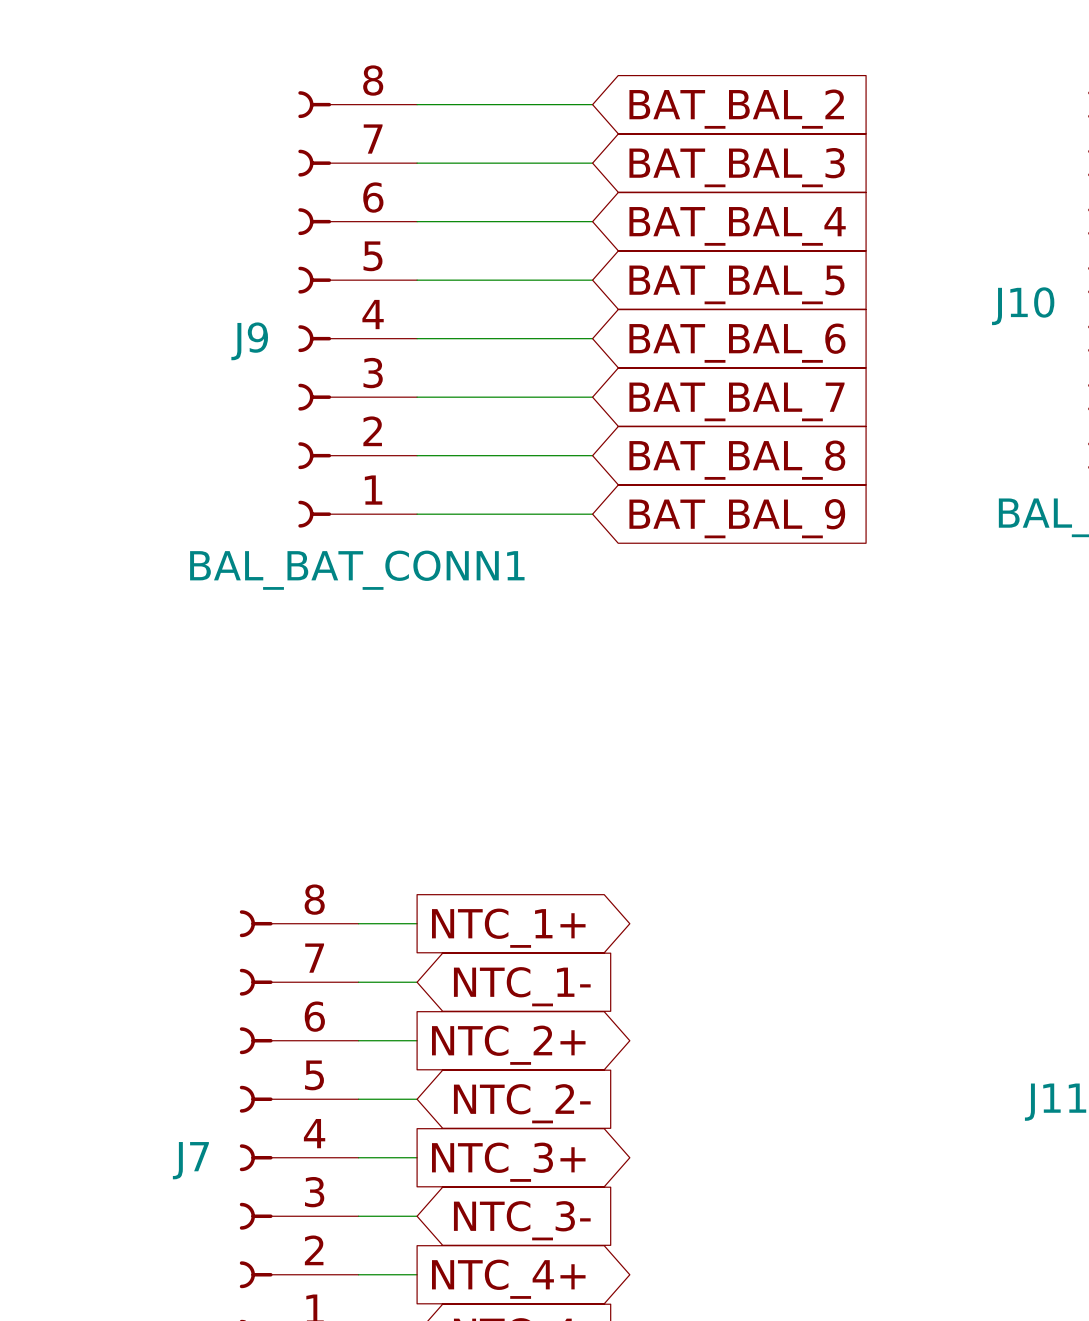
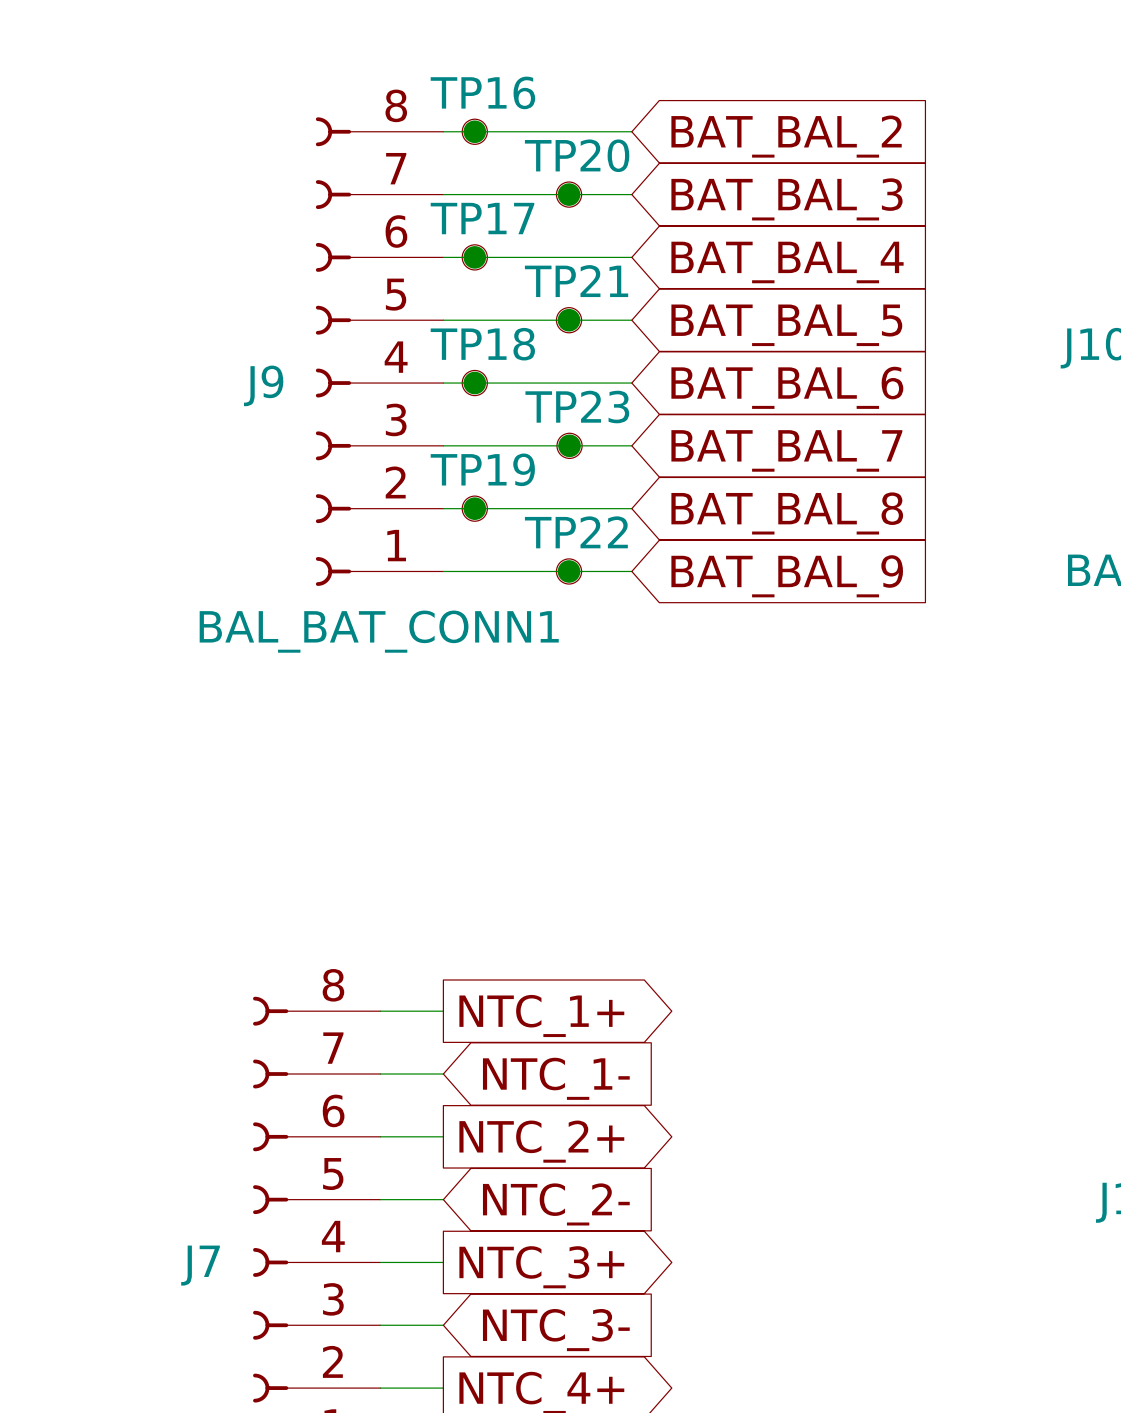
junction: none -> (474, 131)
TP16: none -> (474, 131)
junction: none -> (569, 194)
TP20: none -> (569, 194)
junction: none -> (474, 257)
TP17: none -> (474, 257)
junction: none -> (569, 320)
TP21: none -> (569, 320)
junction: none -> (474, 383)
TP18: none -> (474, 383)
junction: none -> (569, 445)
TP23: none -> (569, 445)
junction: none -> (474, 508)
TP19: none -> (474, 508)
junction: none -> (569, 571)
TP22: none -> (569, 571)

